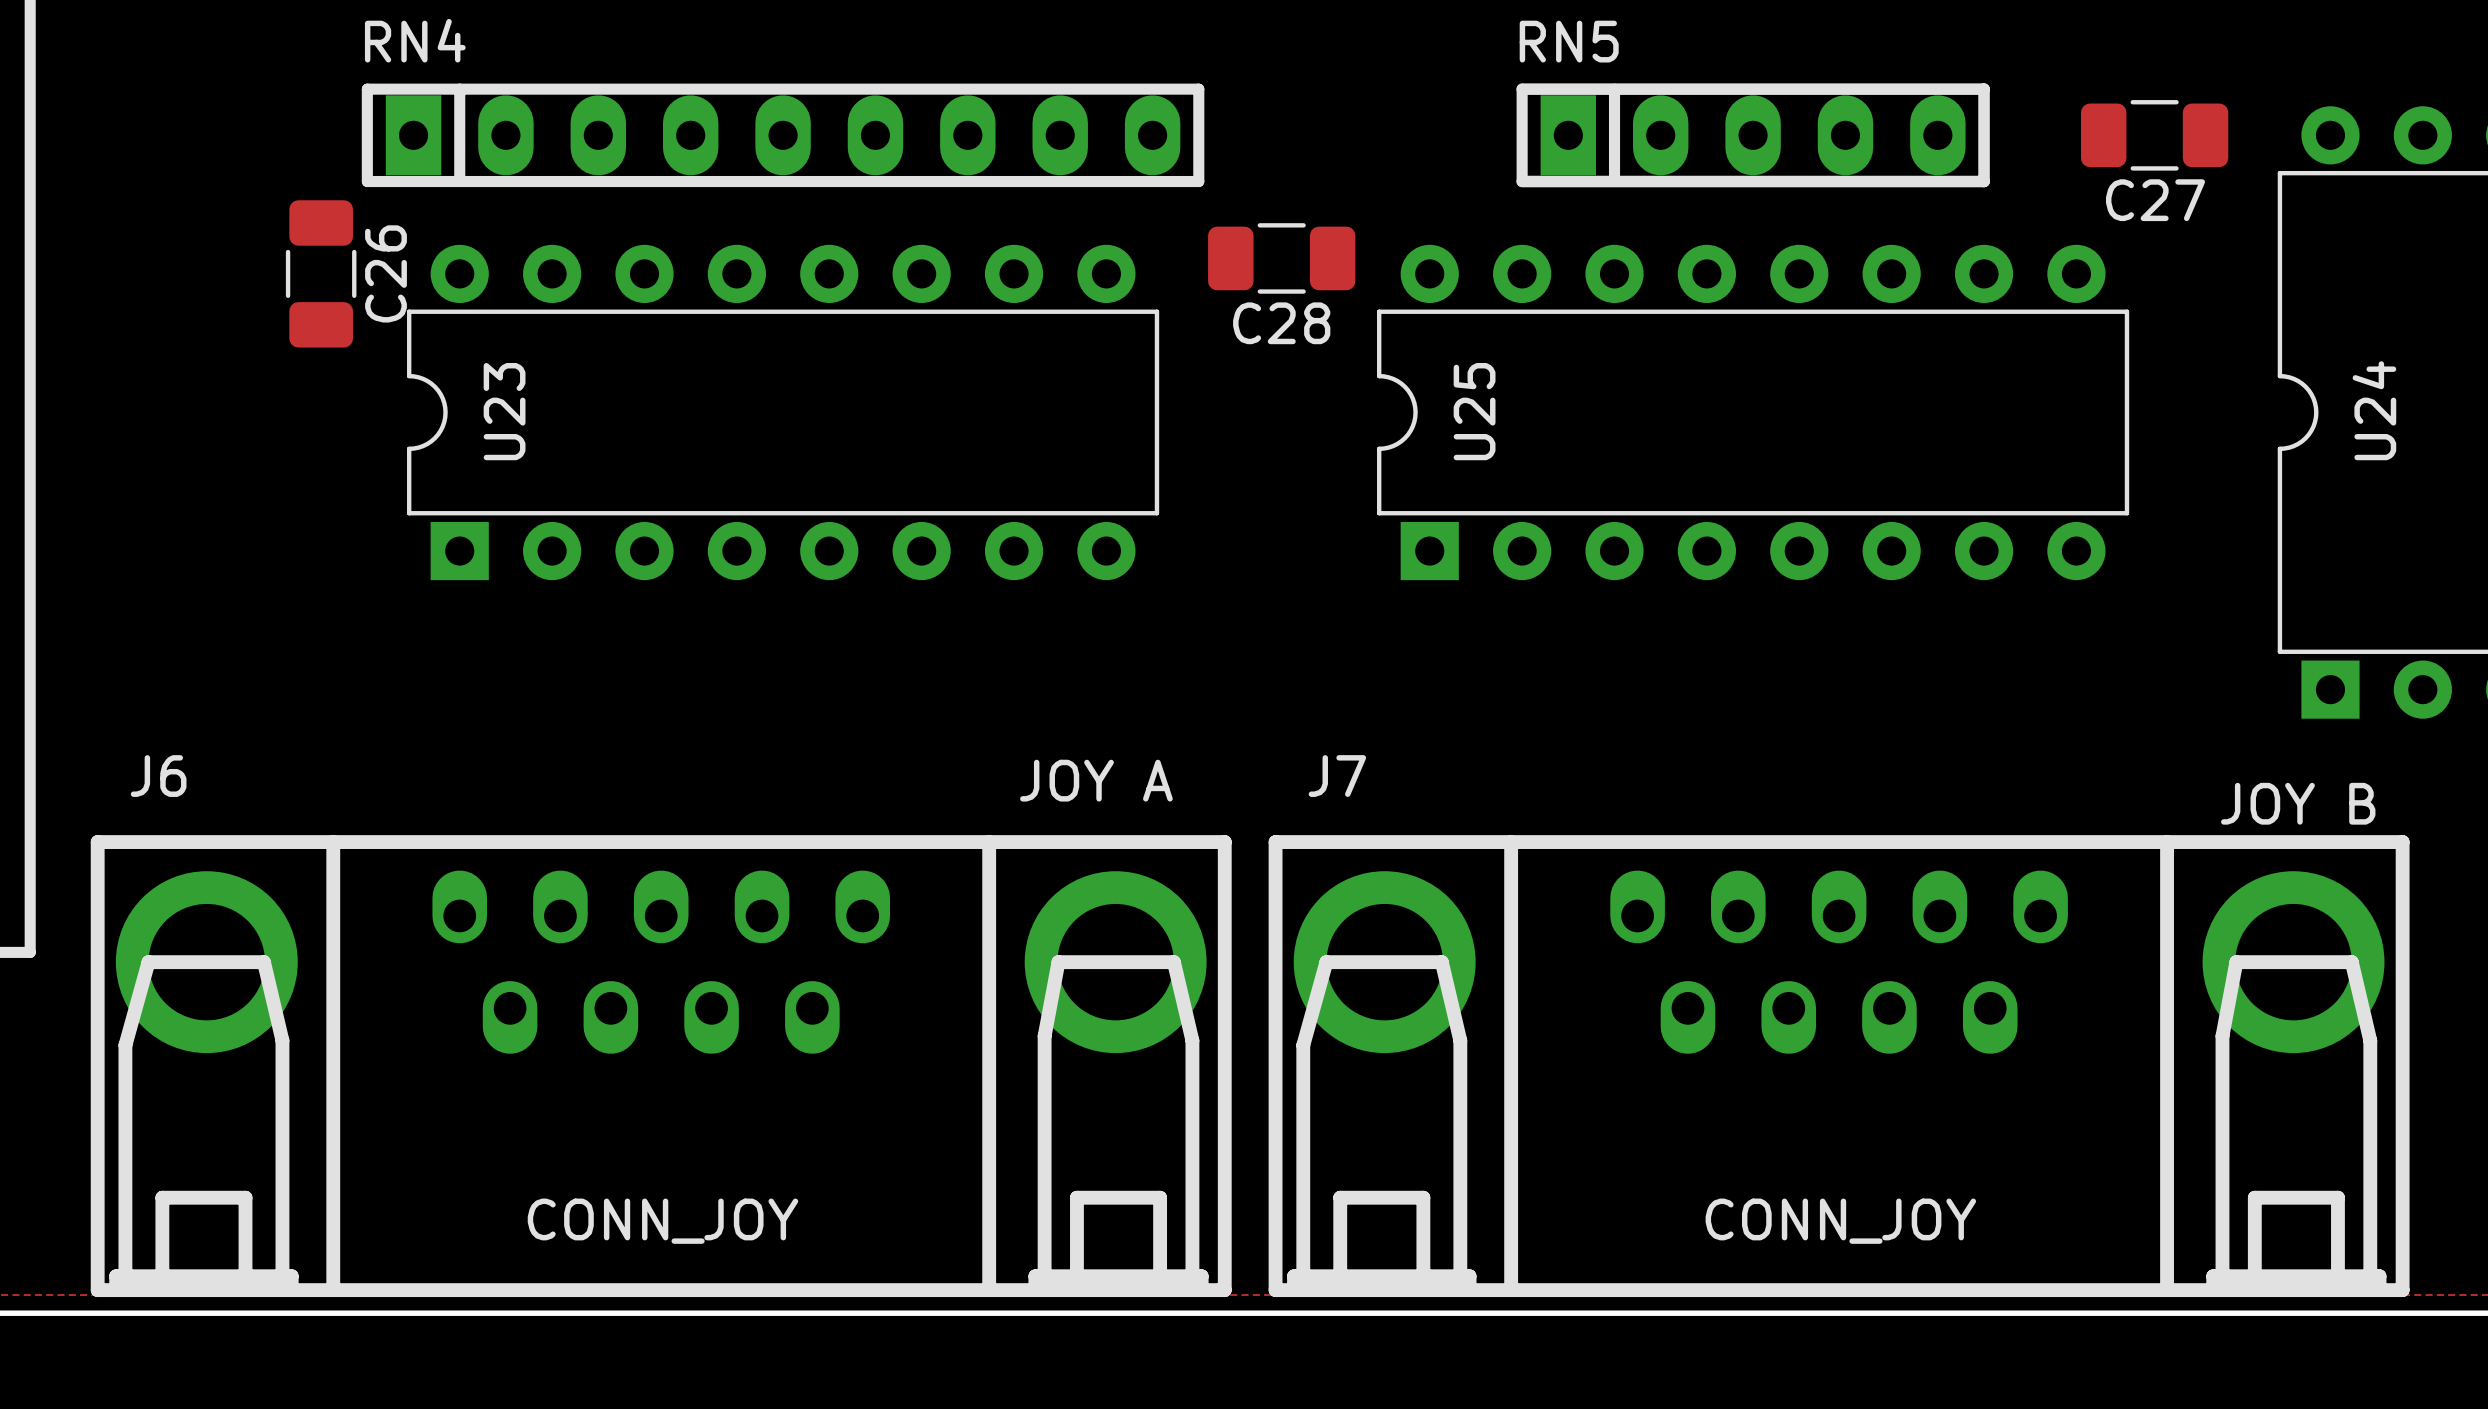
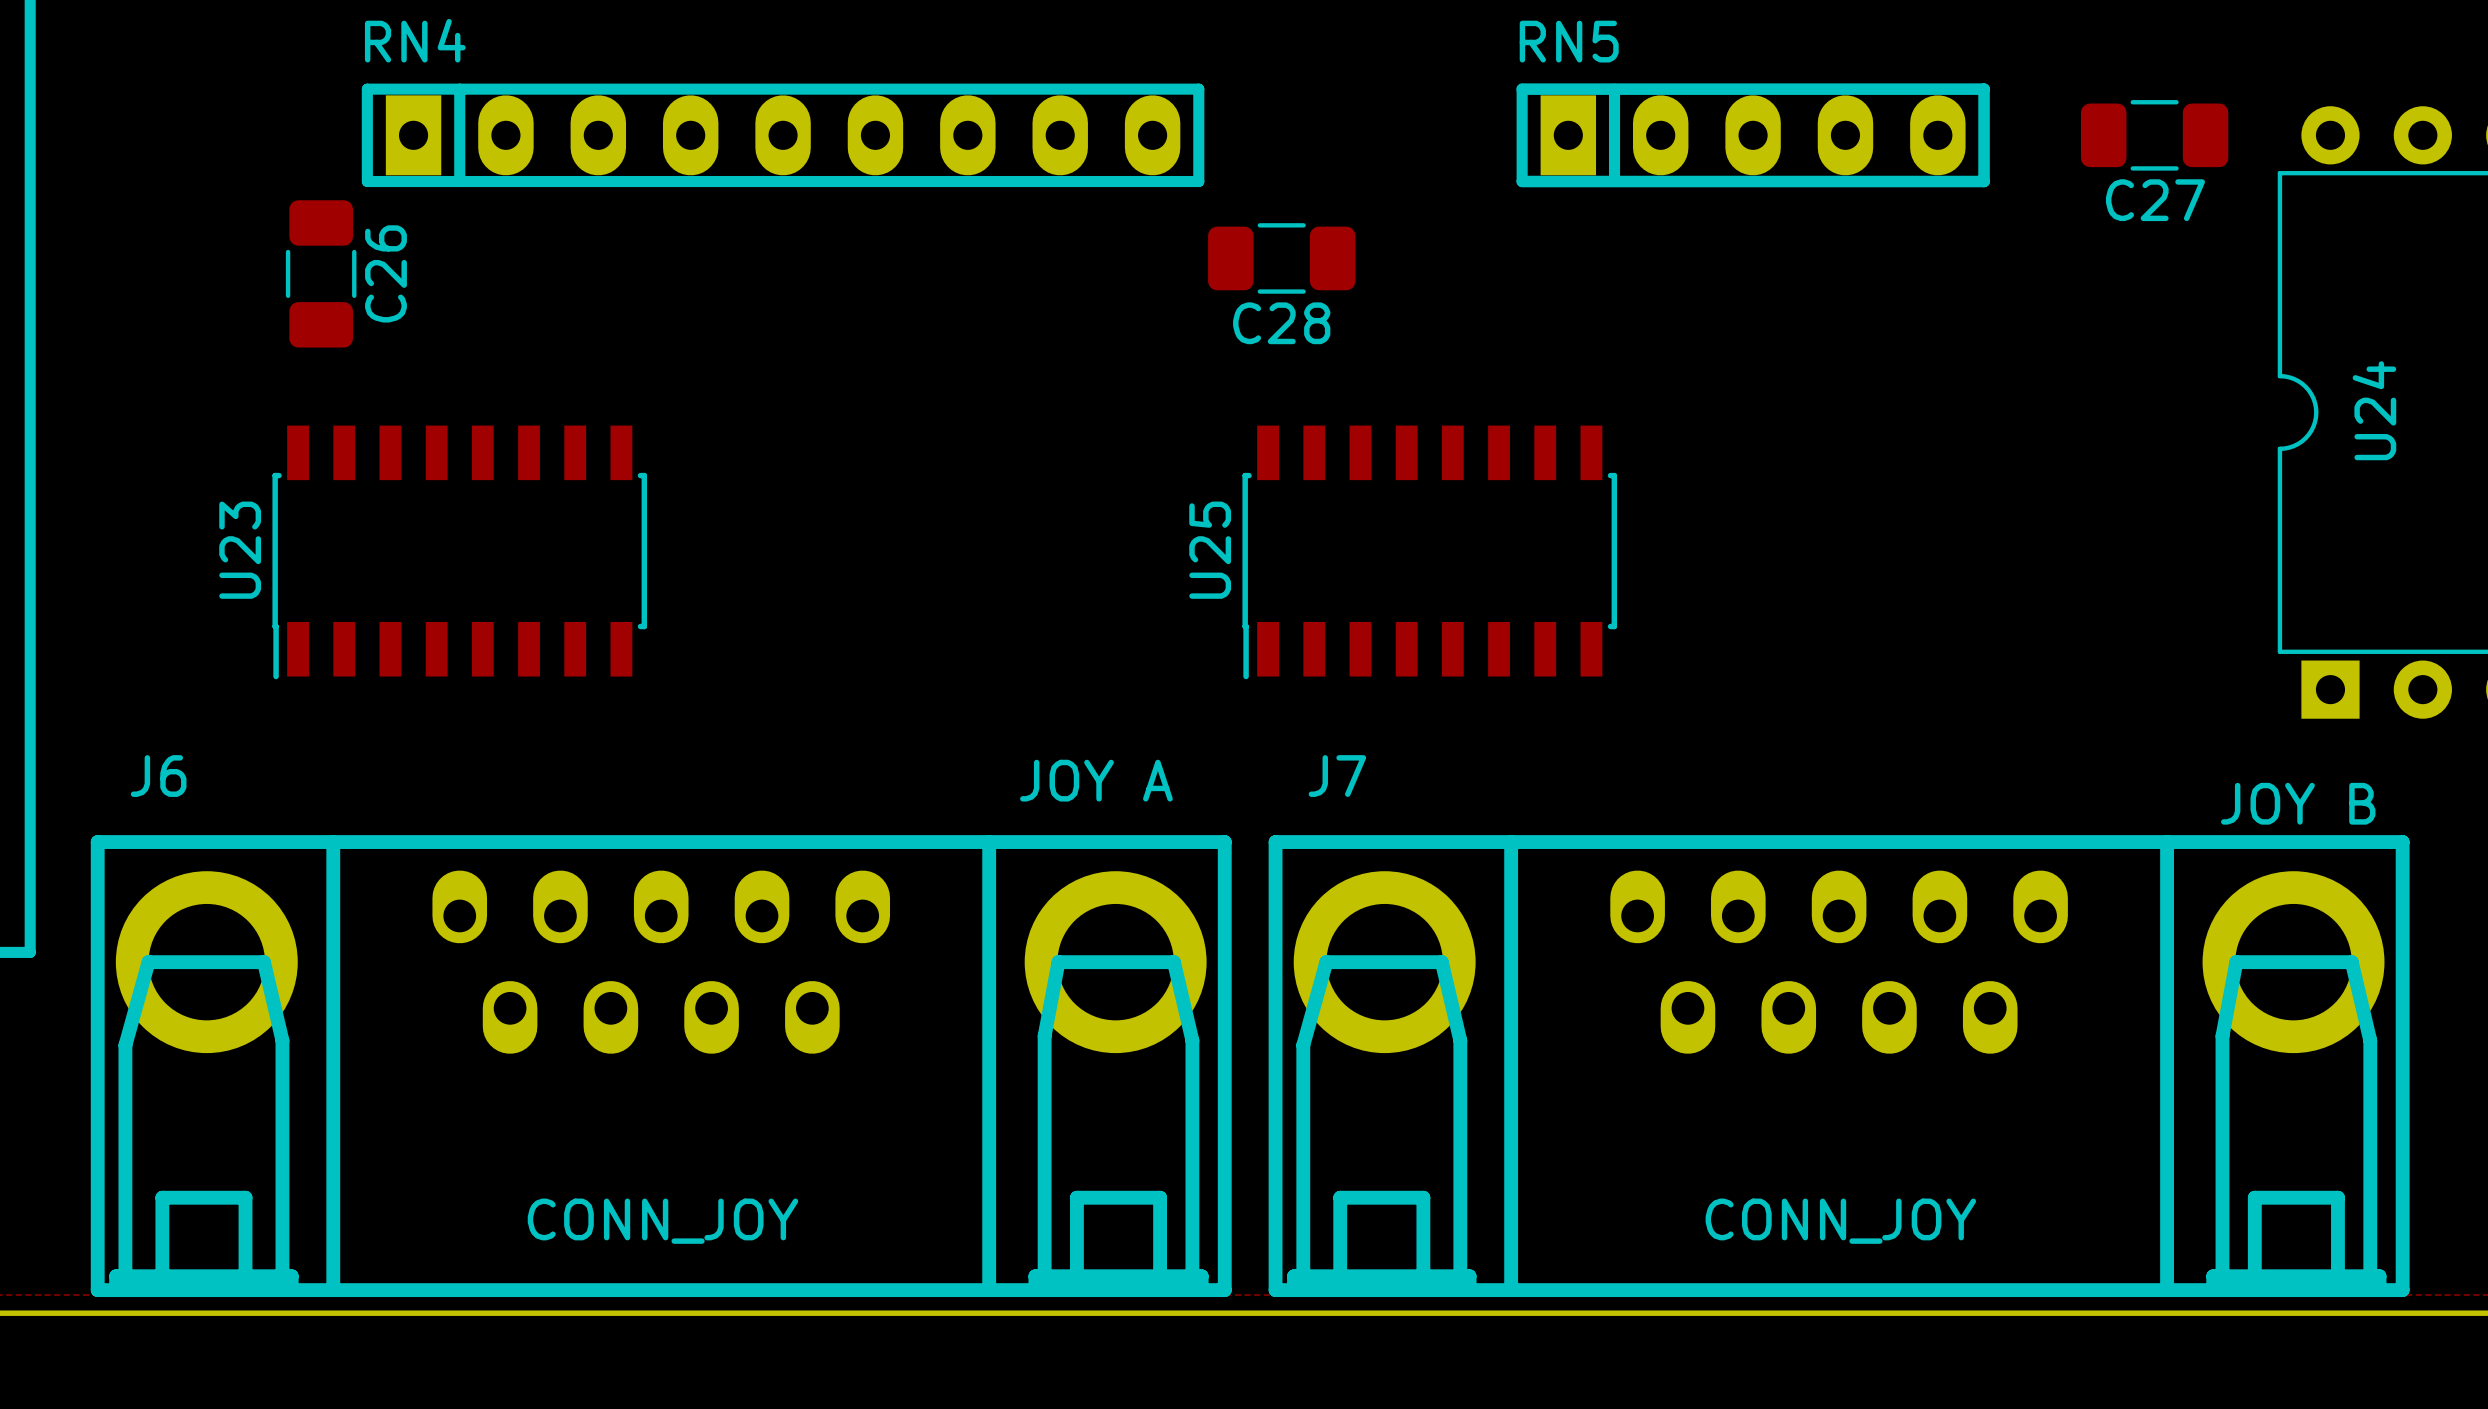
U23 footprint: [407, 244, 1160, 581] -> [272, 425, 648, 680]
U25 footprint: [1377, 244, 2130, 581] -> [1242, 425, 1618, 680]

